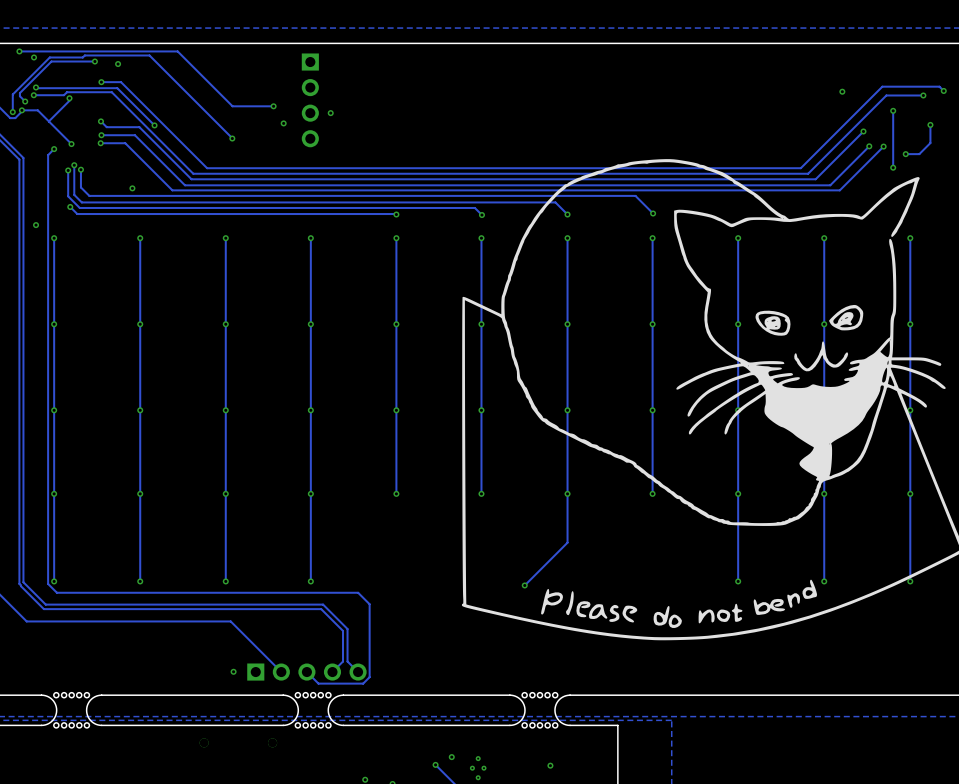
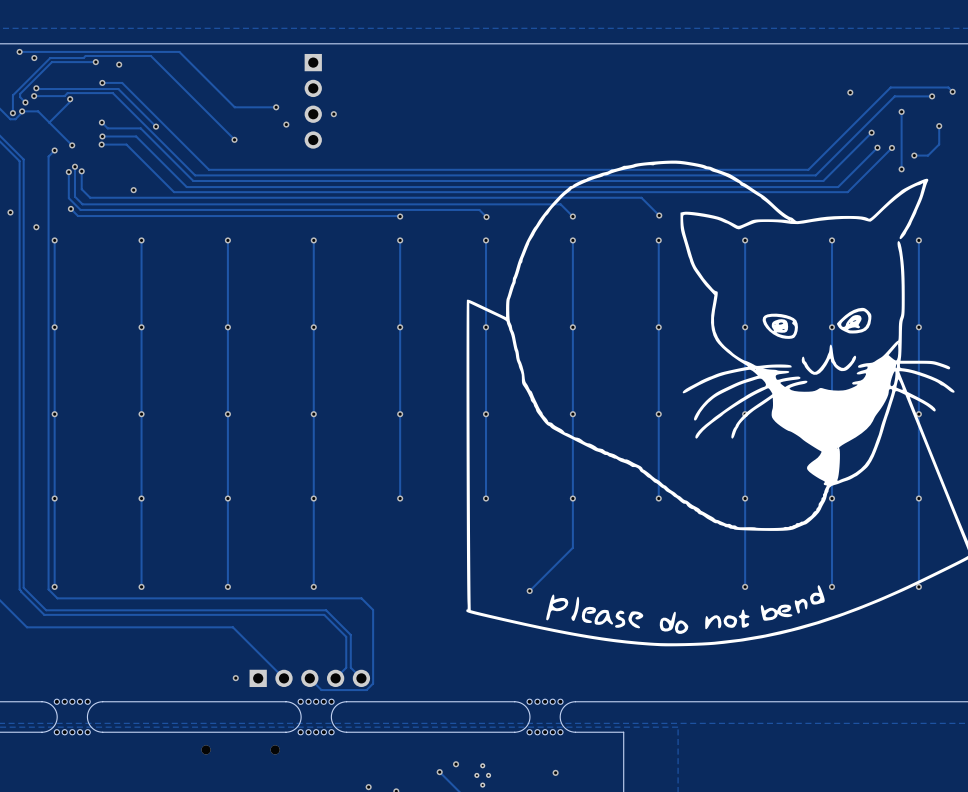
via: none -> (10, 212)

